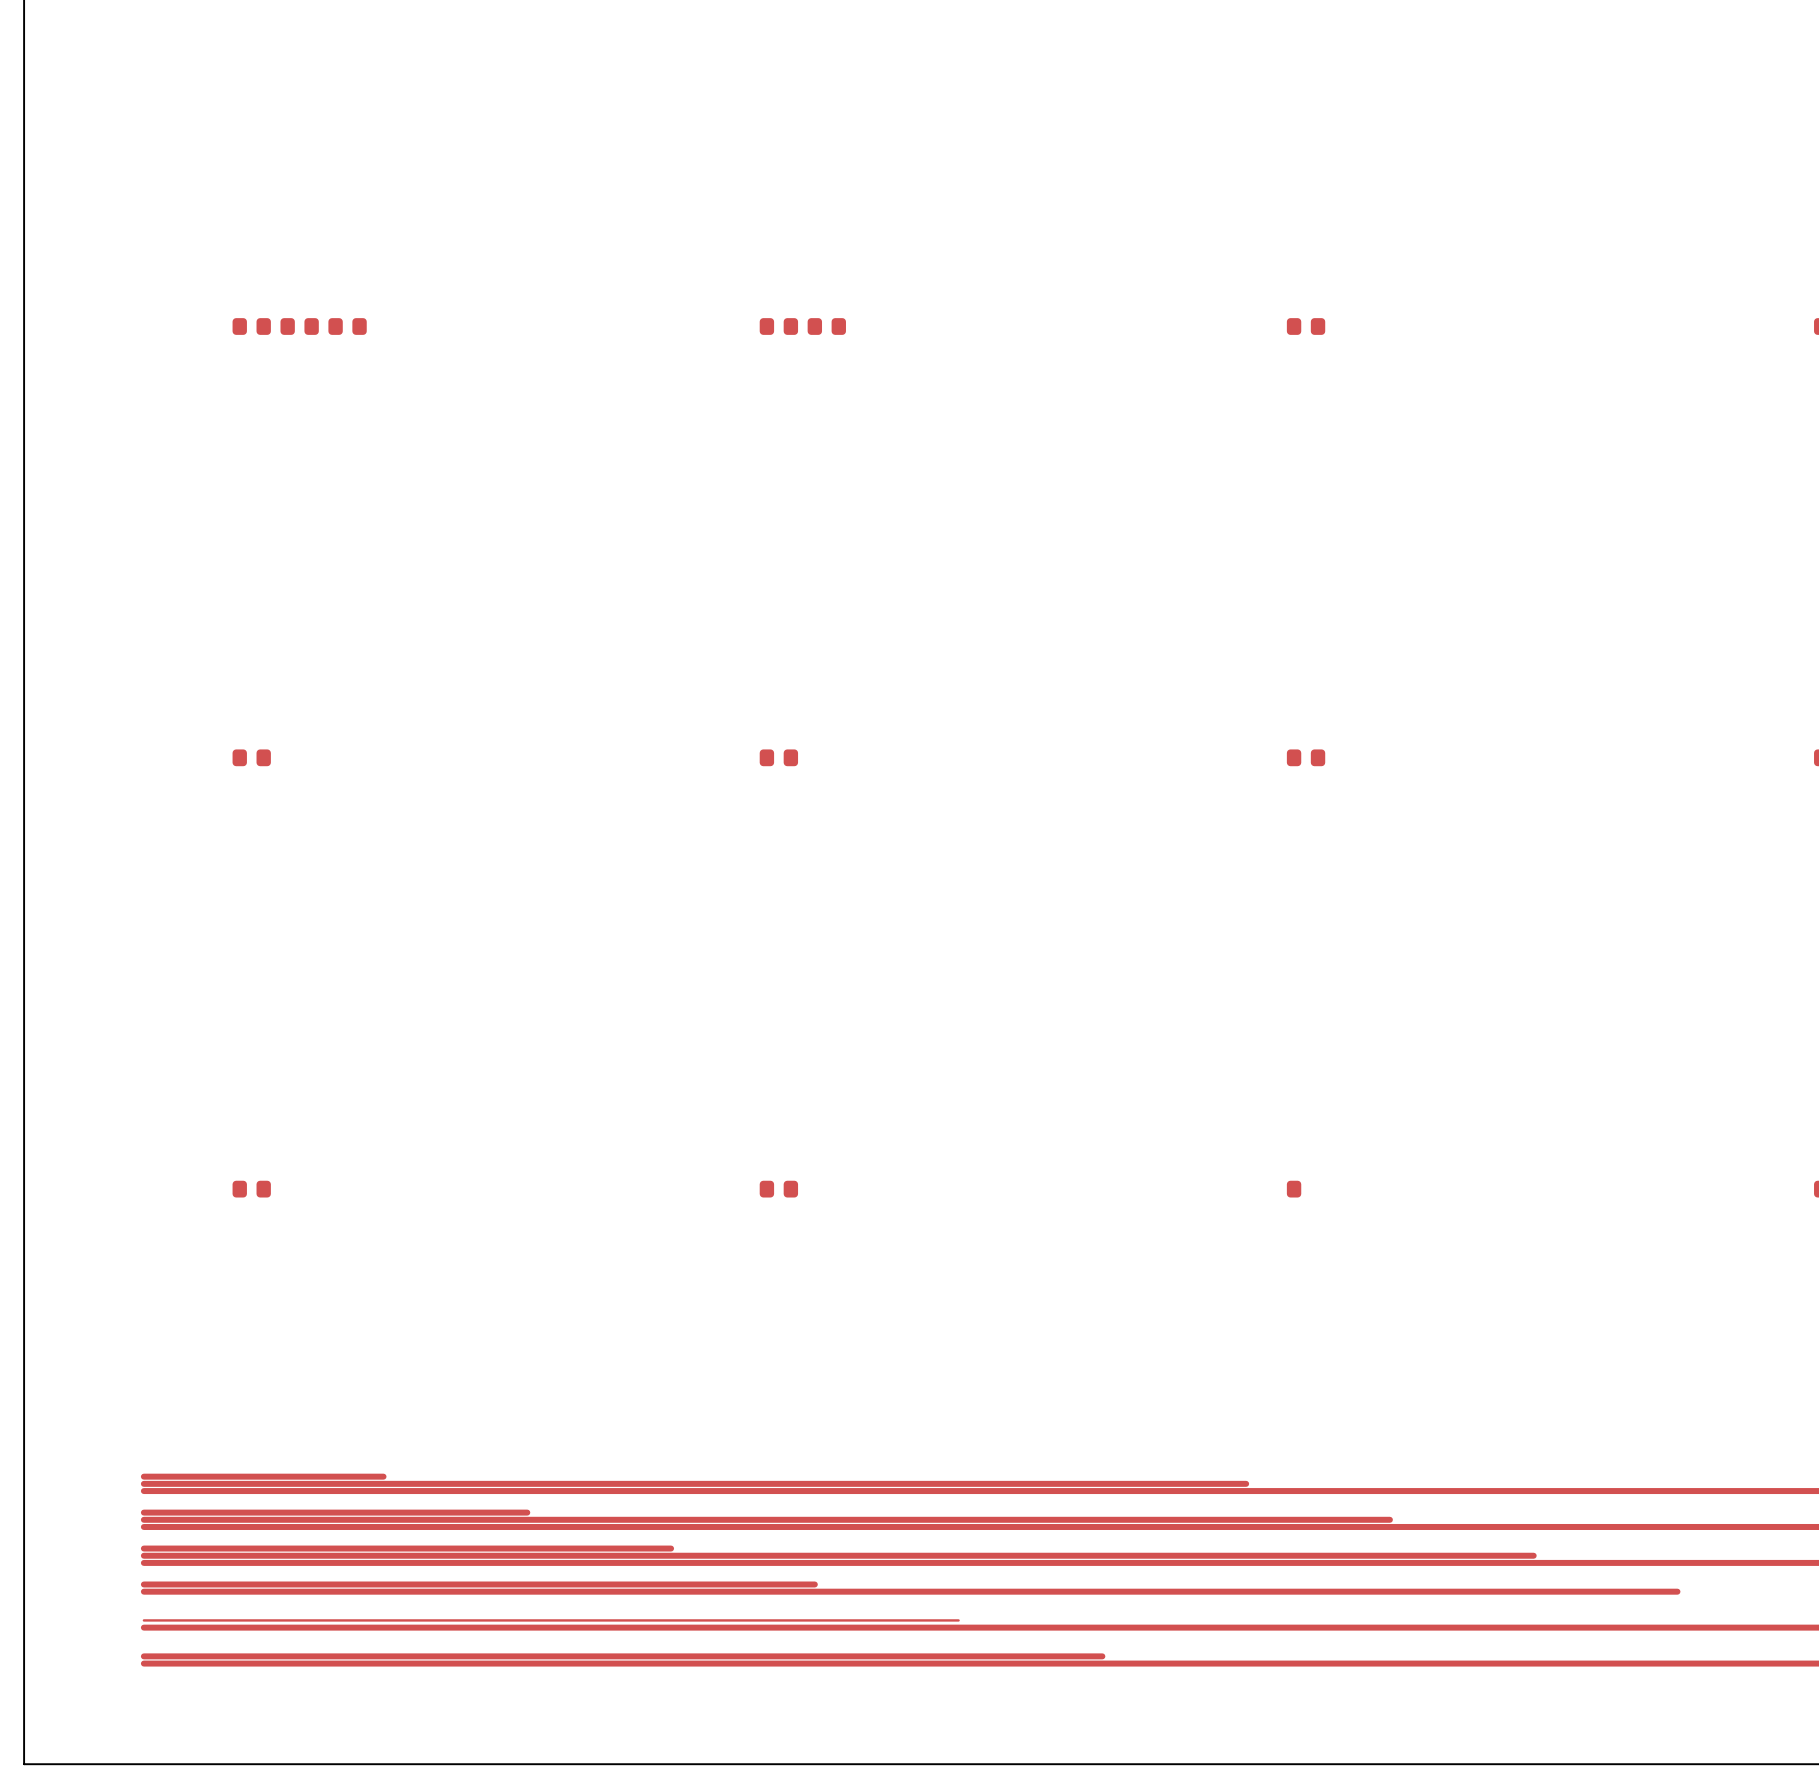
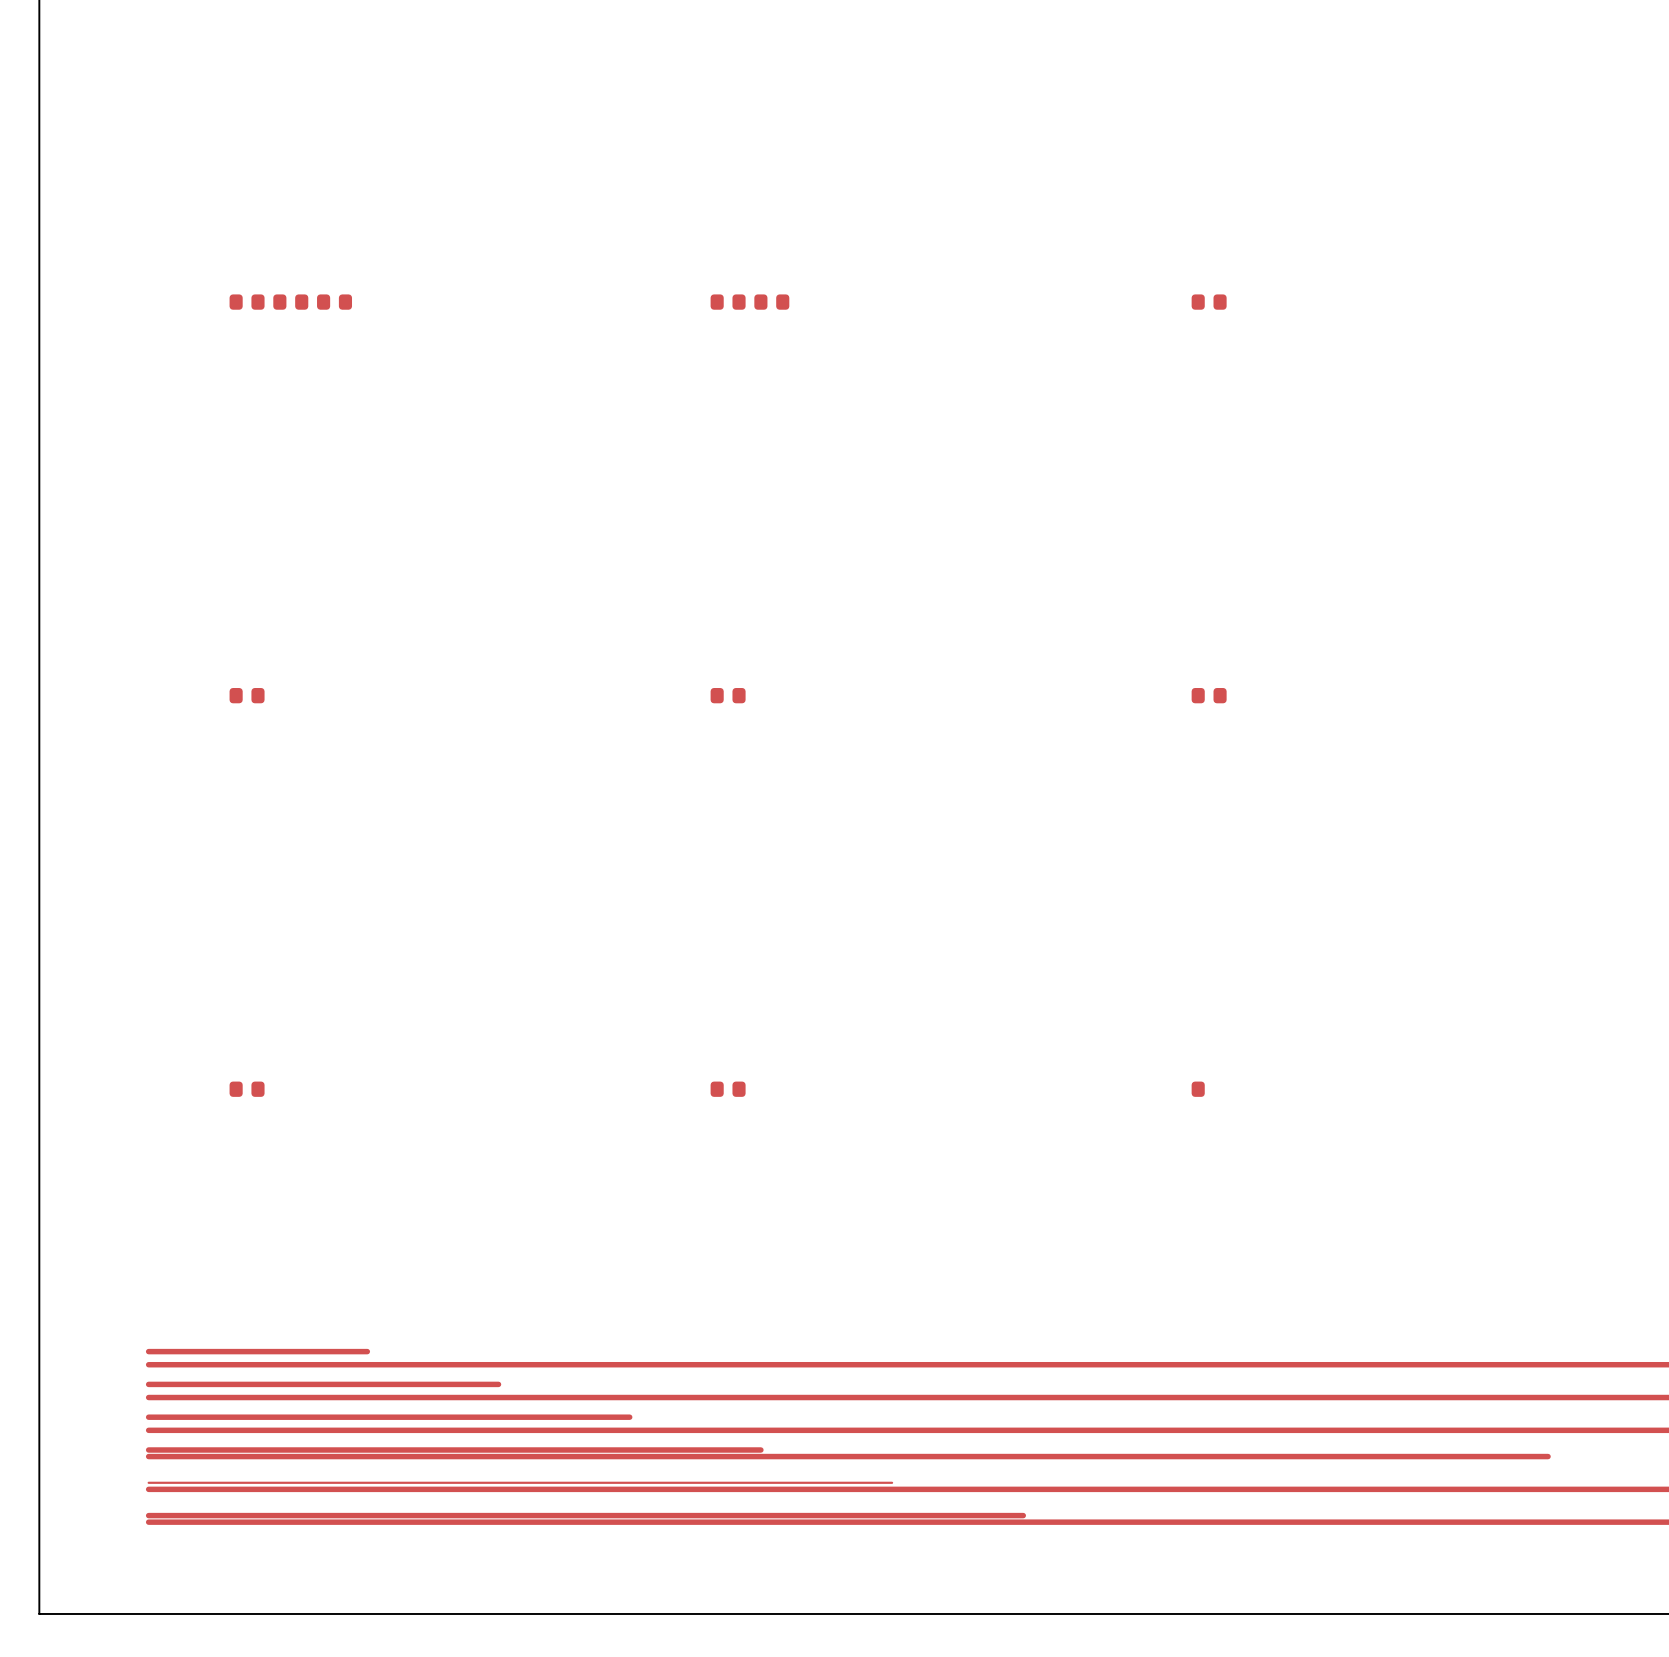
top track: (143, 1483) (1246, 1483) -> none
top track: (143, 1519) (1389, 1519) -> none
top track: (143, 1555) (1533, 1555) -> none

